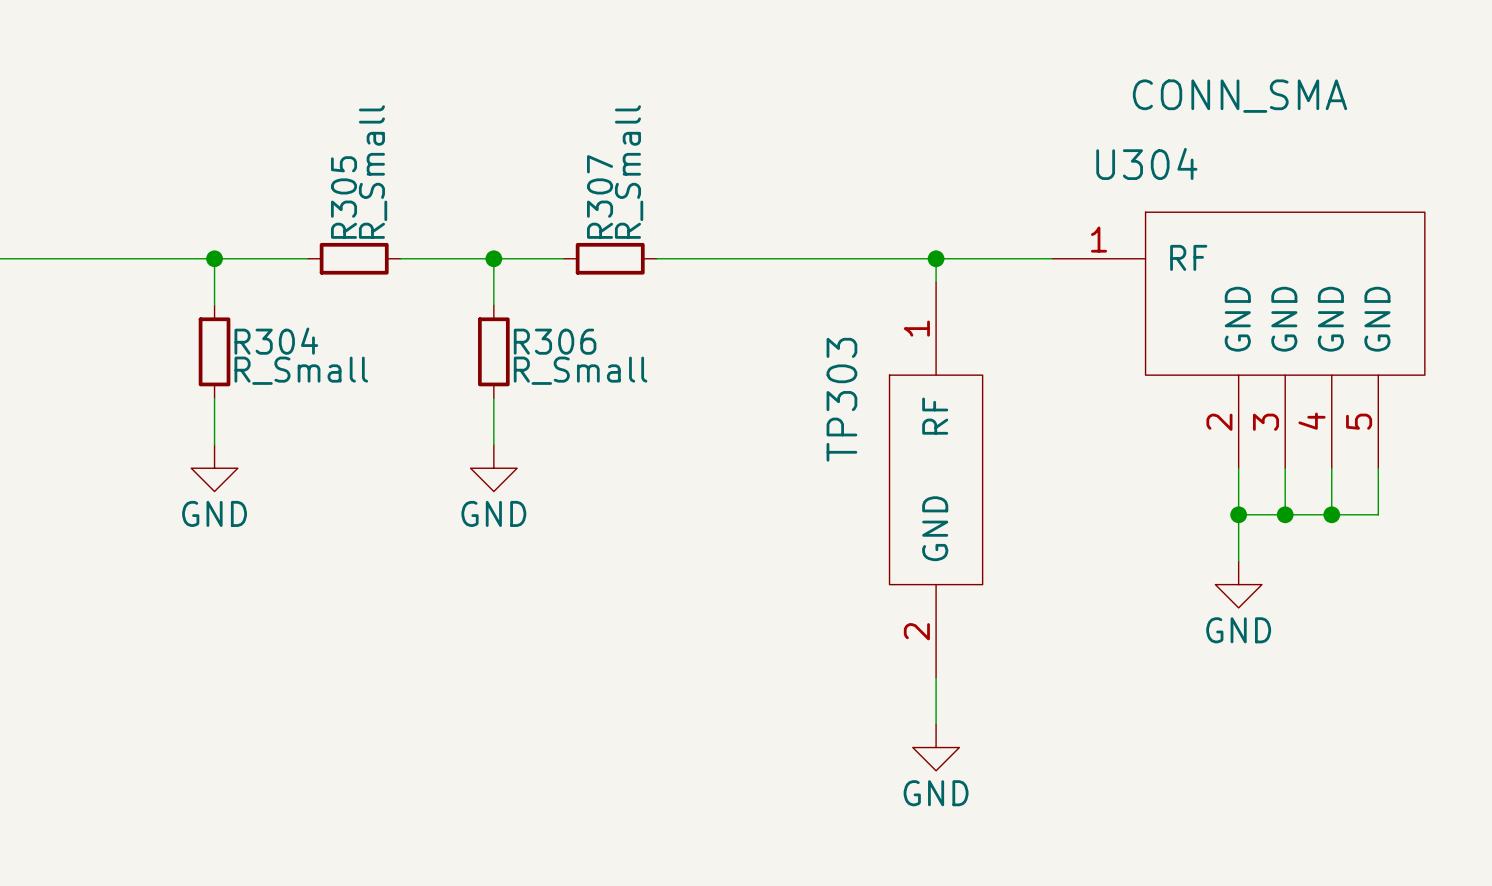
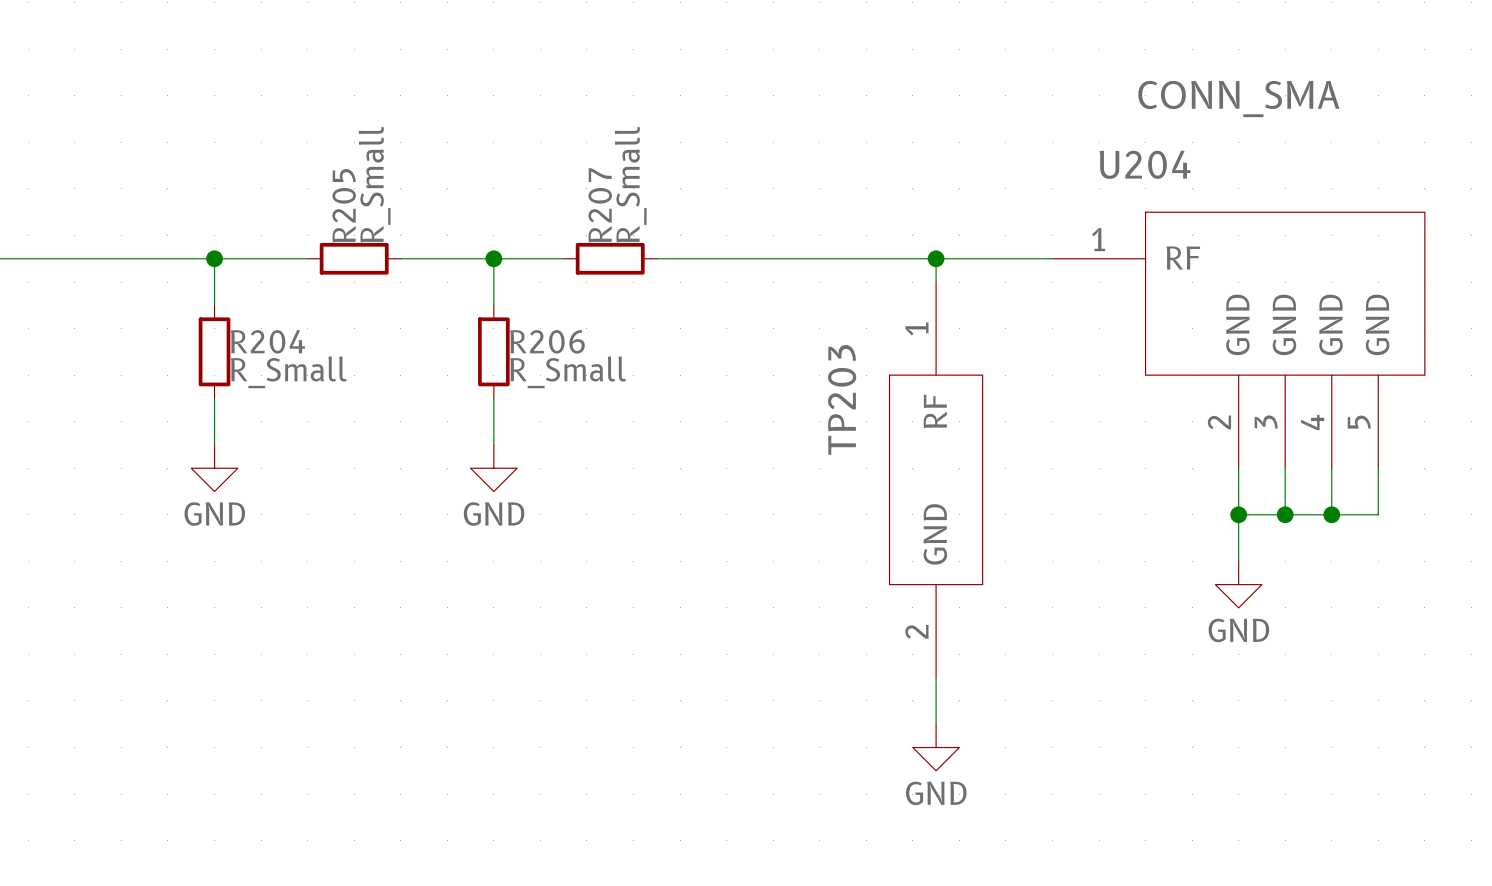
U304 name: U304 (1146, 163) -> U204 (1145, 164)
R307 name: R307 (600, 196) -> R207 (600, 205)
R305 name: R305 (344, 197) -> R205 (344, 205)
R304 name: R304 (276, 341) -> R204 (267, 341)
R306 name: R306 (555, 341) -> R206 (547, 341)
TP303 name: TP303 (841, 399) -> TP203 (842, 399)

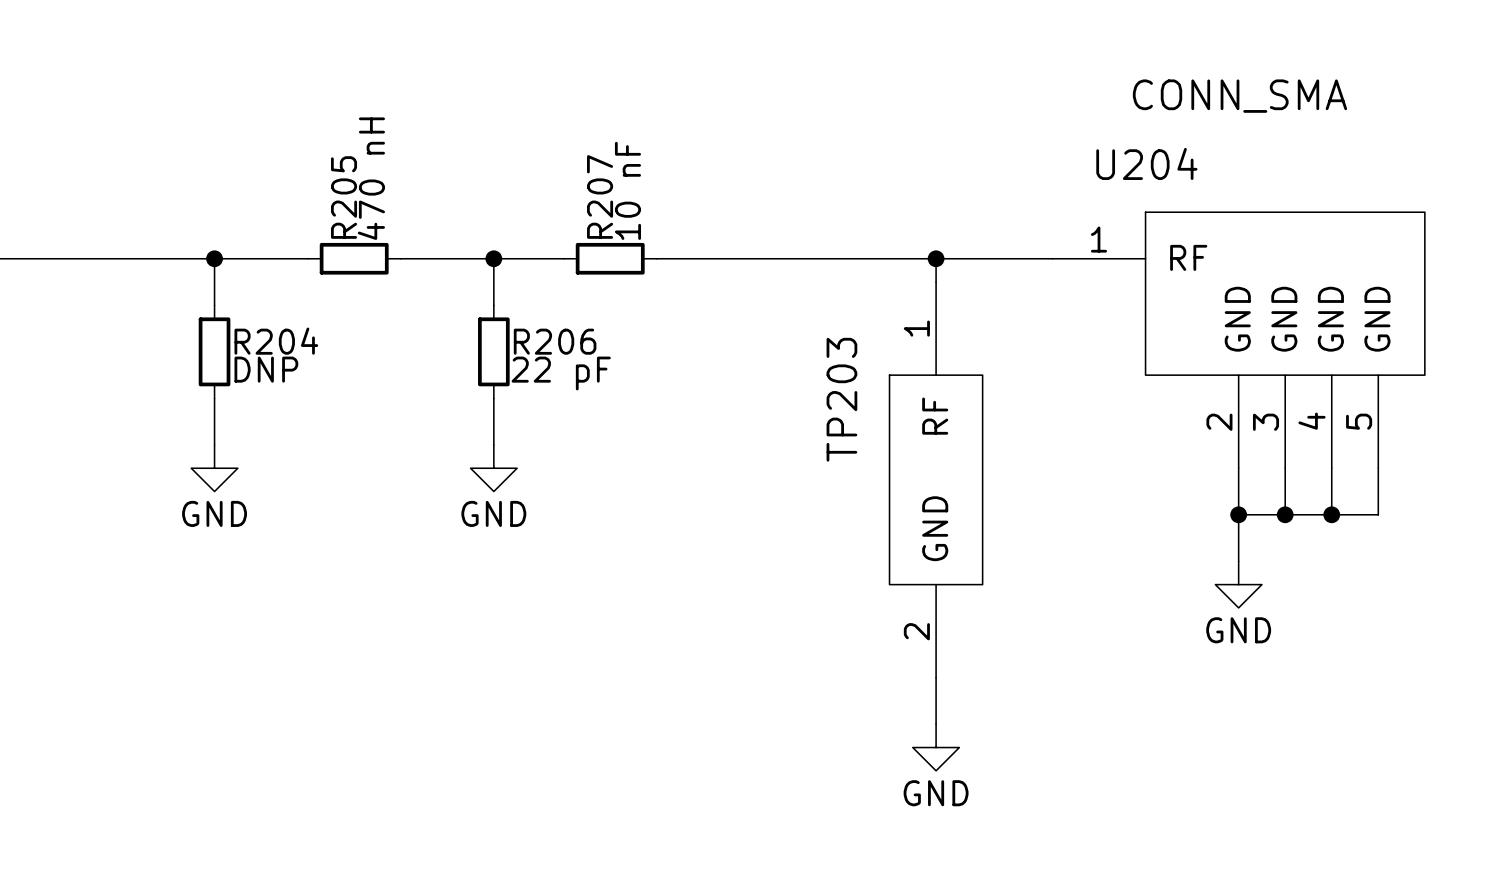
R205 value: R_Small (374, 184) -> 470 nH (371, 178)
R207 value: R_Small (630, 184) -> 10 nF (627, 190)
R204 value: R_Small (288, 372) -> DNP (266, 369)
R206 value: R_Small (568, 372) -> 22 pF (561, 373)

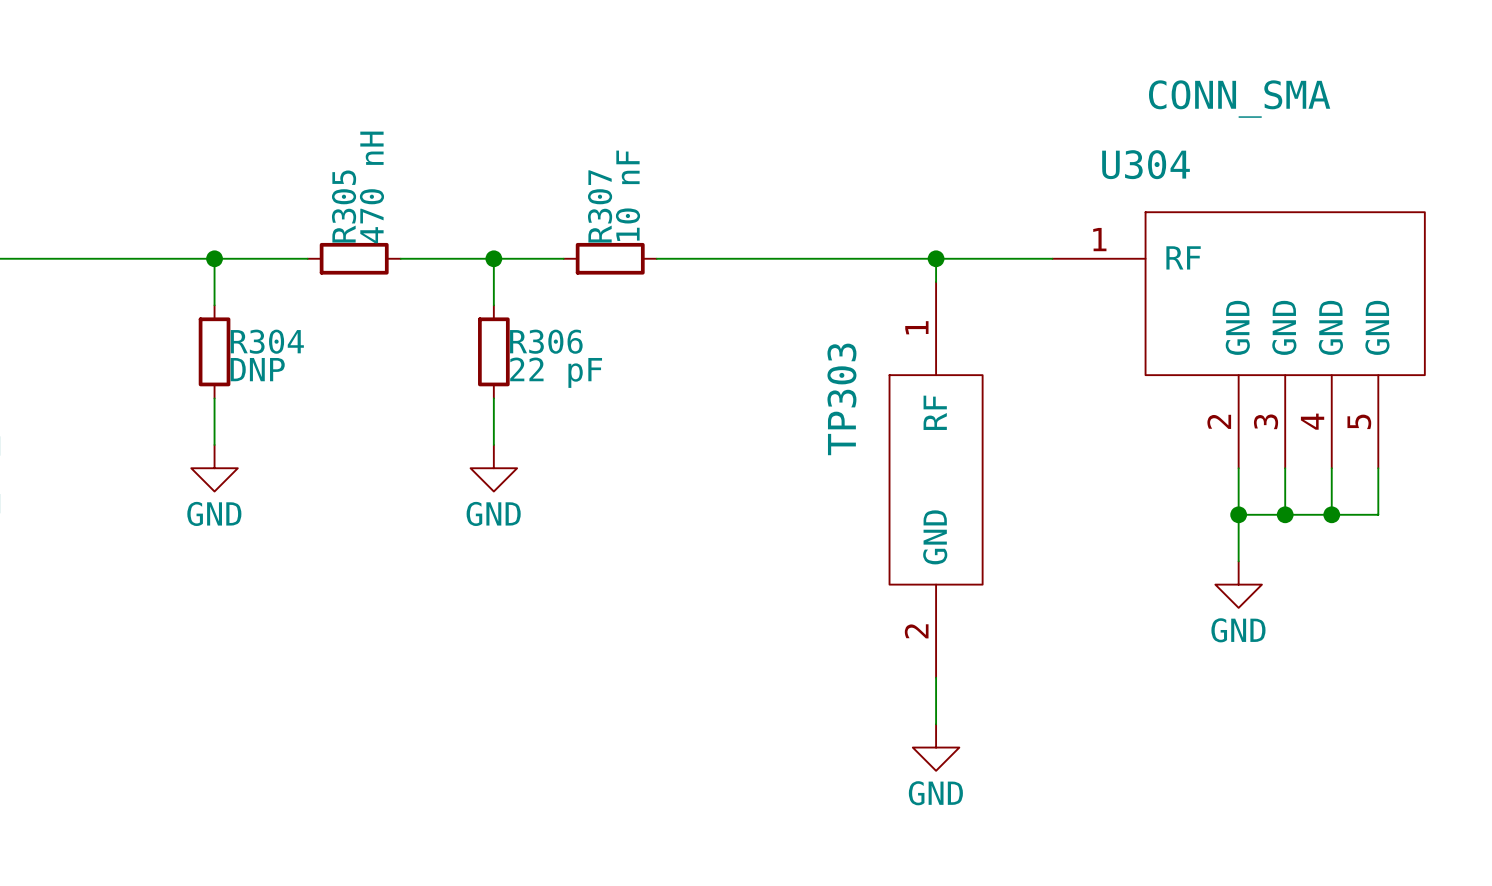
U204 name: U204 (1146, 163) -> U304 (1146, 164)
R207 name: R207 (600, 196) -> R307 (600, 206)
R205 name: R205 (344, 197) -> R305 (344, 206)
R204 name: R204 (276, 341) -> R304 (267, 341)
R206 name: R206 (555, 341) -> R306 (546, 341)
TP203 name: TP203 (841, 399) -> TP303 (841, 399)

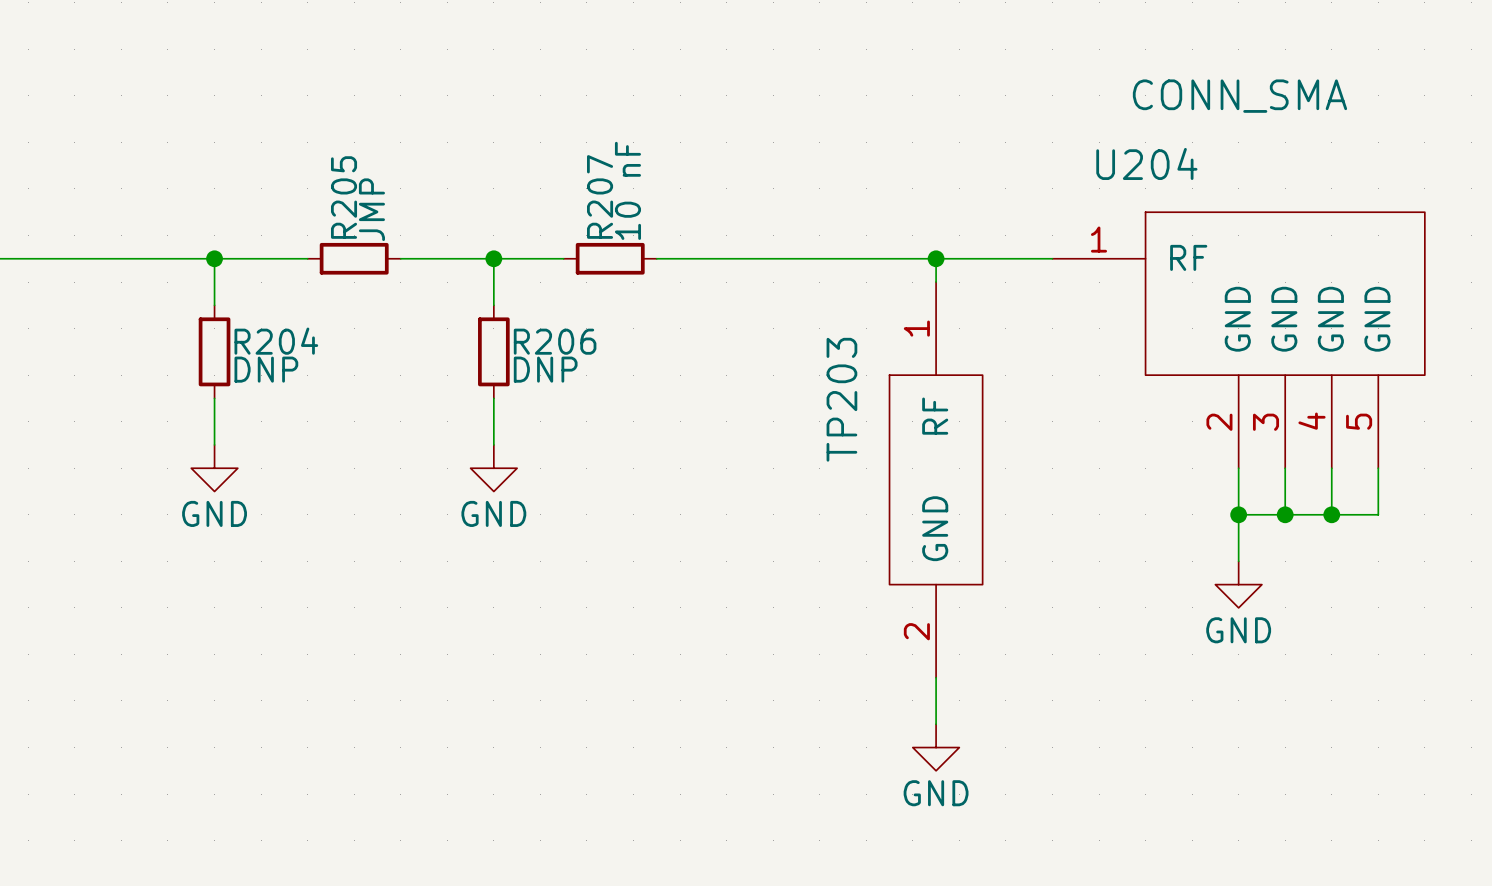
U304 name: U304 (1146, 164) -> U204 (1146, 163)
R305 value: 470 nH (371, 187) -> JMP (371, 209)
R305 name: R305 (344, 206) -> R205 (344, 197)
R307 name: R307 (600, 206) -> R207 (600, 196)
R304 name: R304 (267, 341) -> R204 (276, 341)
R306 name: R306 (546, 341) -> R206 (555, 341)
R306 value: 22 pF (556, 372) -> DNP (545, 369)
TP303 name: TP303 (841, 399) -> TP203 (841, 399)

